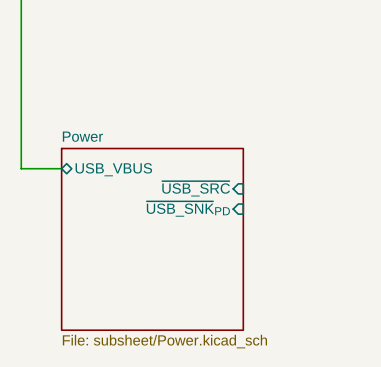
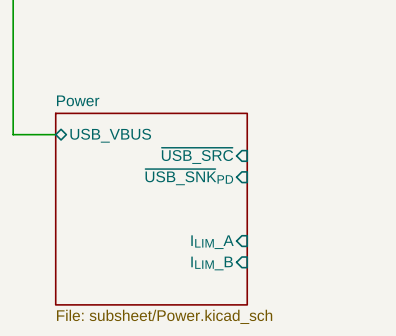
sheet pin: none -> ILIM_A (212, 242)
sheet pin: none -> ILIM_B (212, 263)

